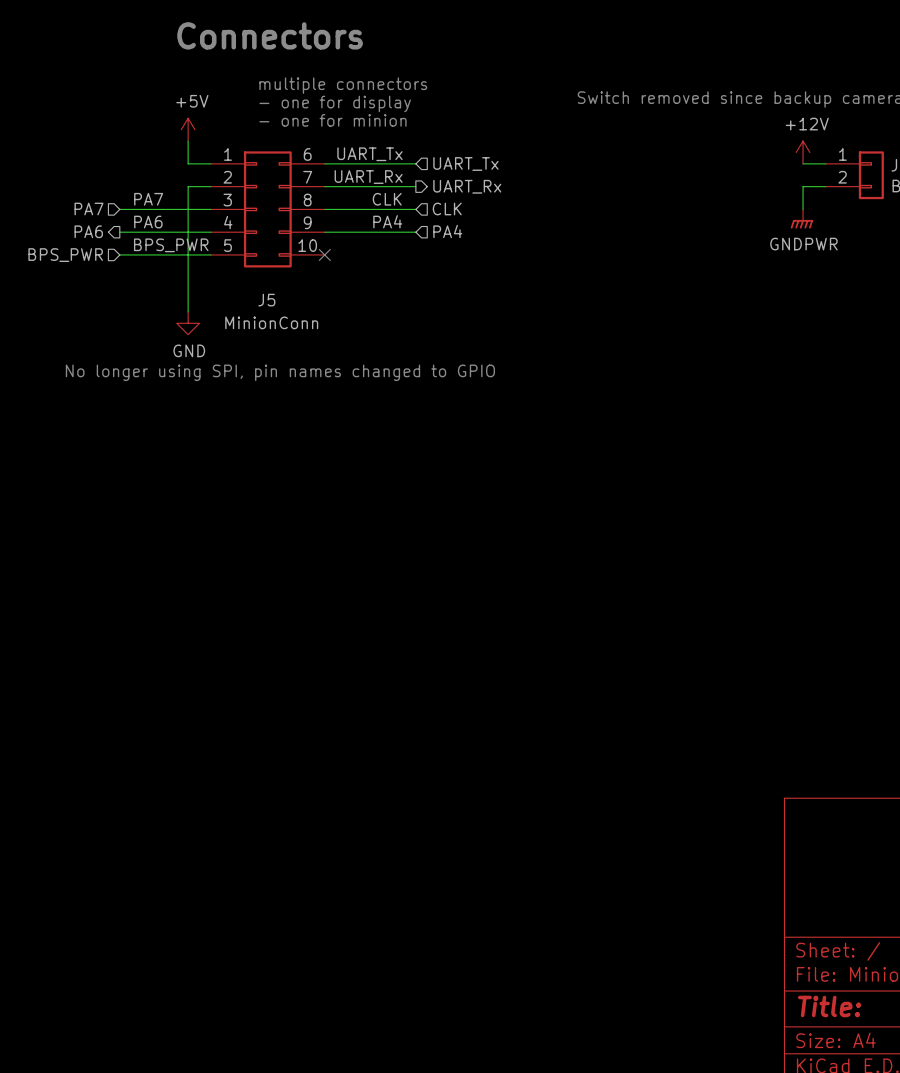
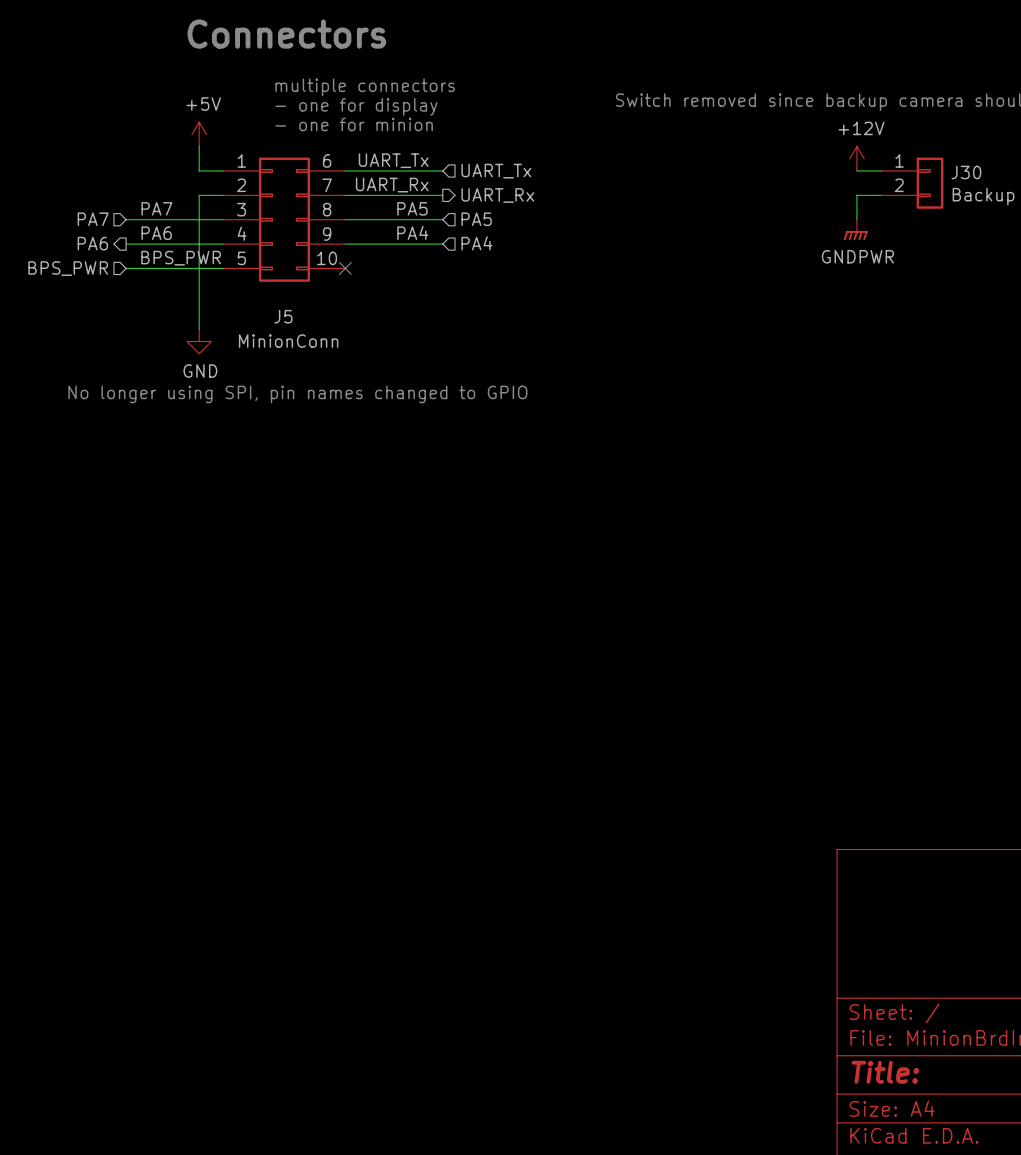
label: CLK (387, 199) -> PA5 (412, 208)
hierarchical label: CLK (447, 208) -> PA5 (476, 219)

